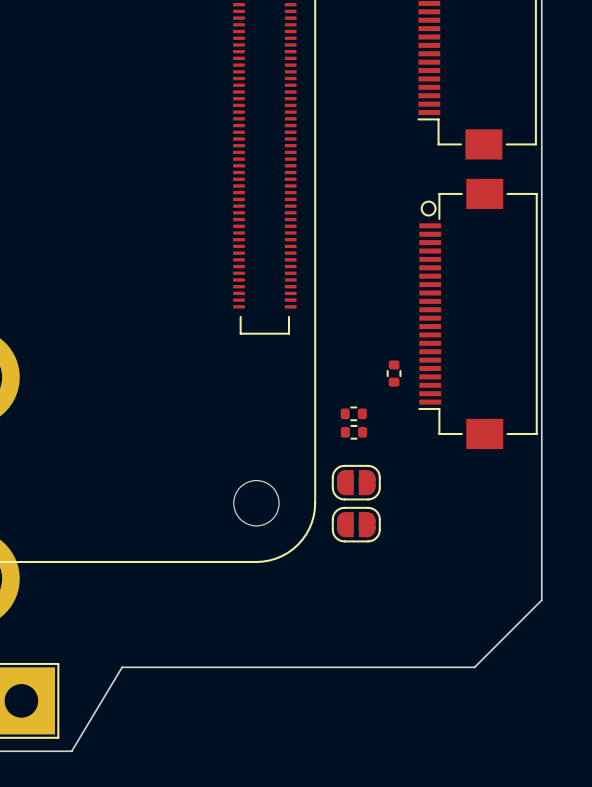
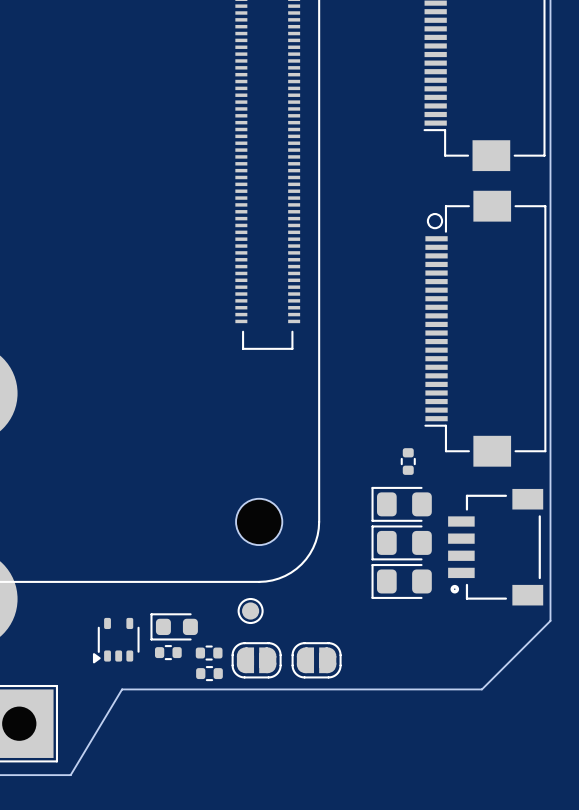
part: (394, 373) -> none
part: (353, 413) -> none
part: (353, 432) -> none
part: none -> (408, 461)
part: (356, 482) -> none
part: none -> (401, 504)
part: none -> (401, 542)
part: (356, 524) -> none
part: none -> (495, 547)
part: none -> (401, 581)
part: none -> (250, 611)
part: none -> (174, 626)
part: none -> (116, 640)
part: none -> (168, 652)
part: none -> (209, 653)
part: none -> (256, 660)
part: none -> (316, 660)
part: none -> (209, 673)

